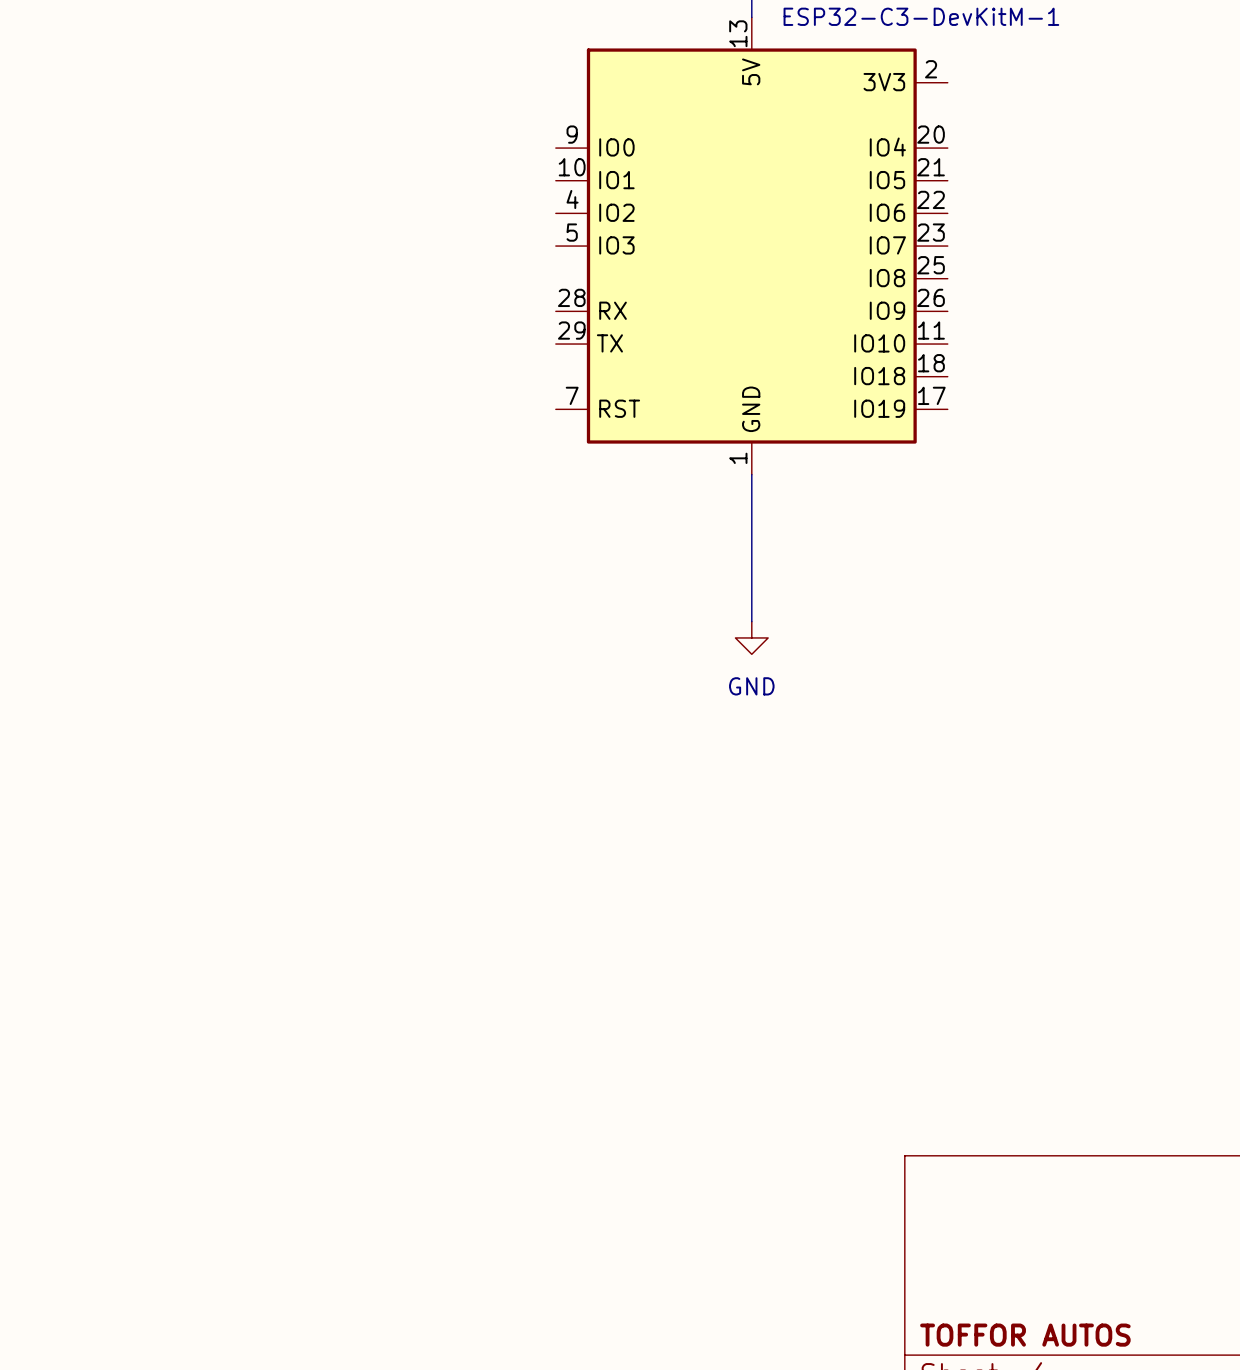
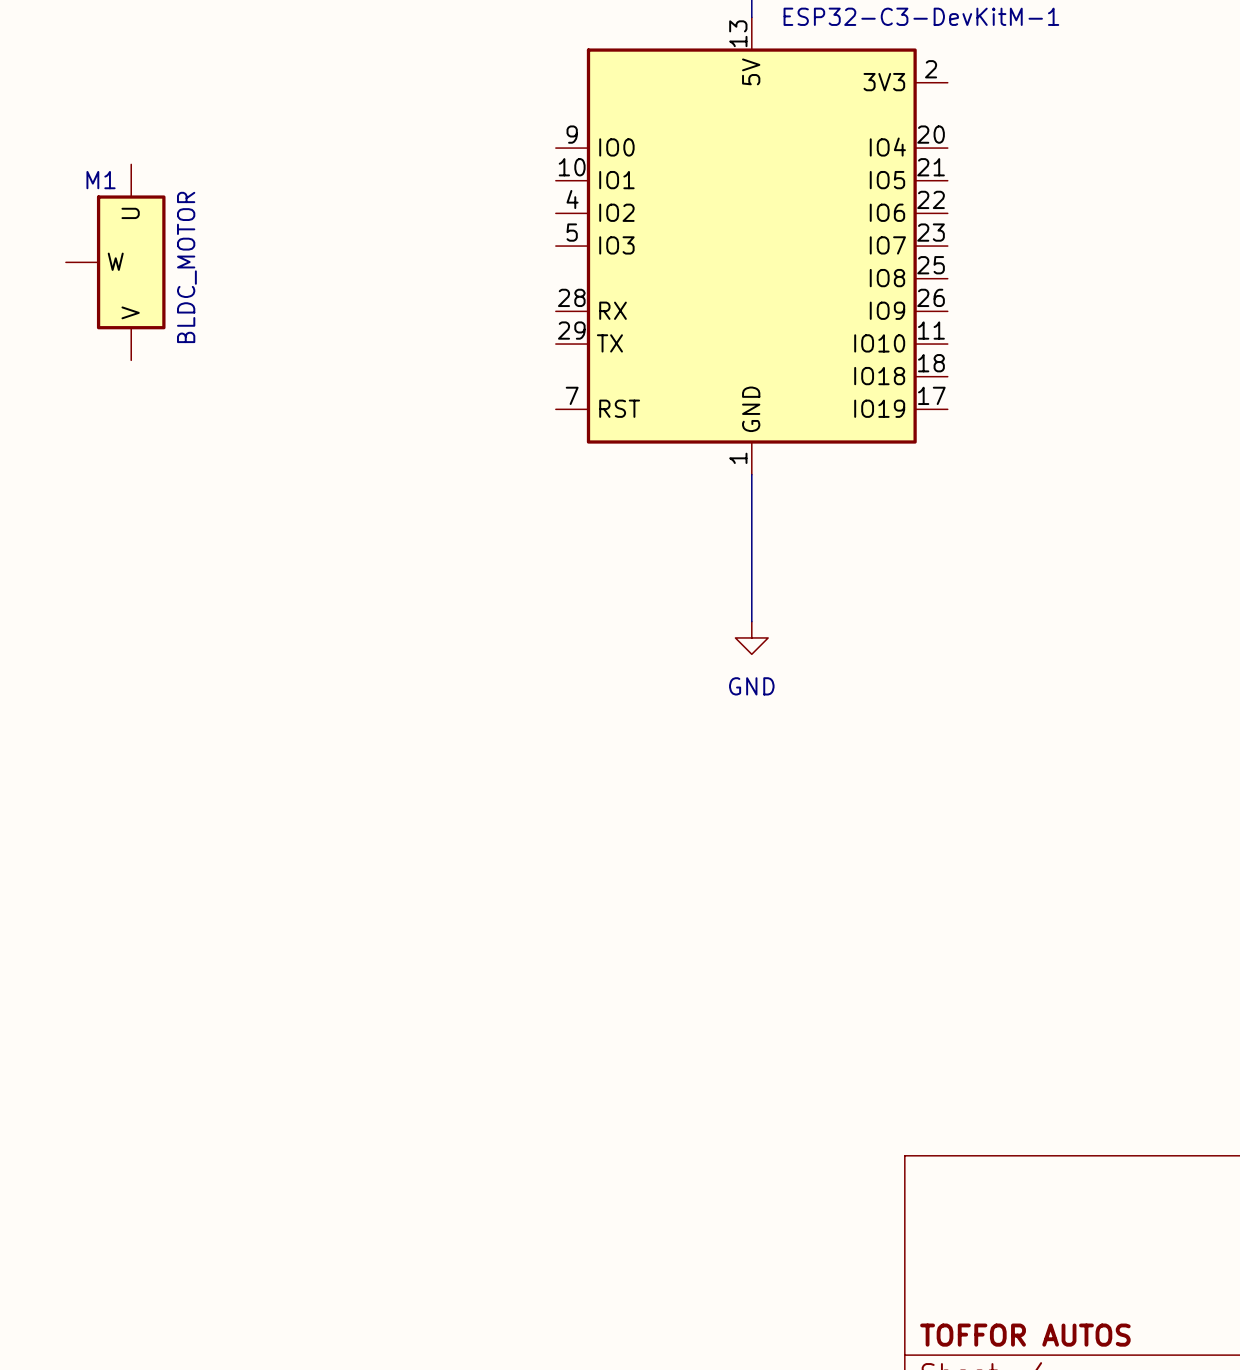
M1: none -> BLDC_MOTOR (115, 262)

